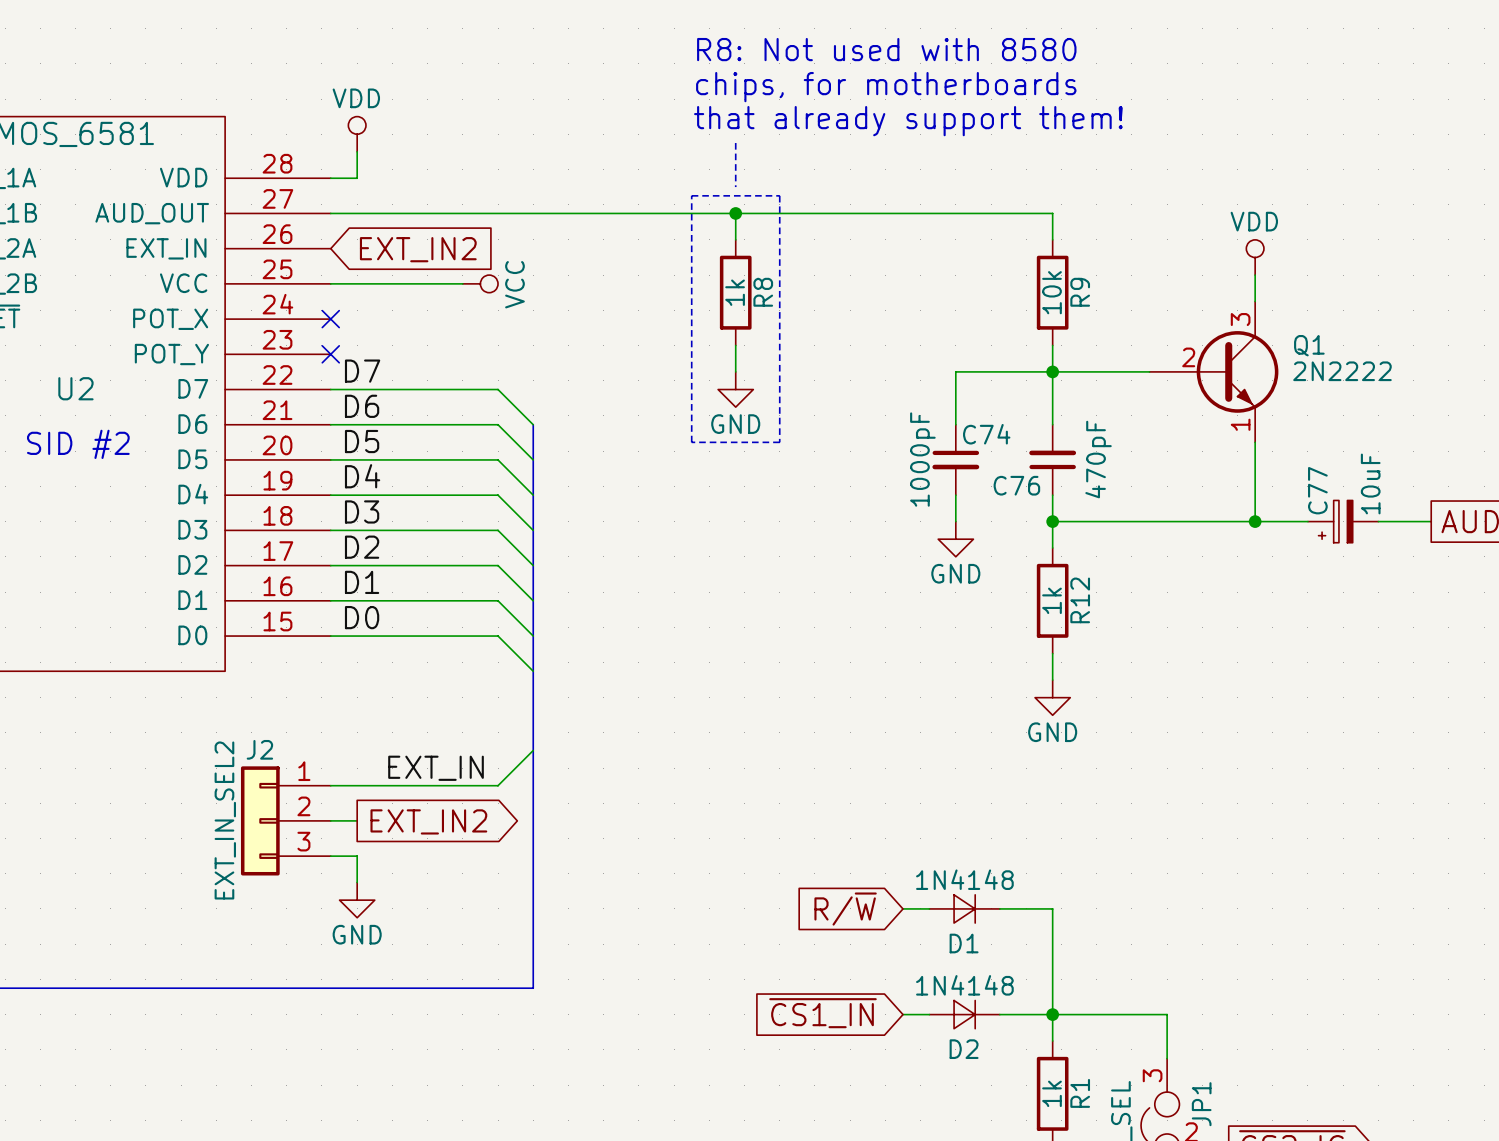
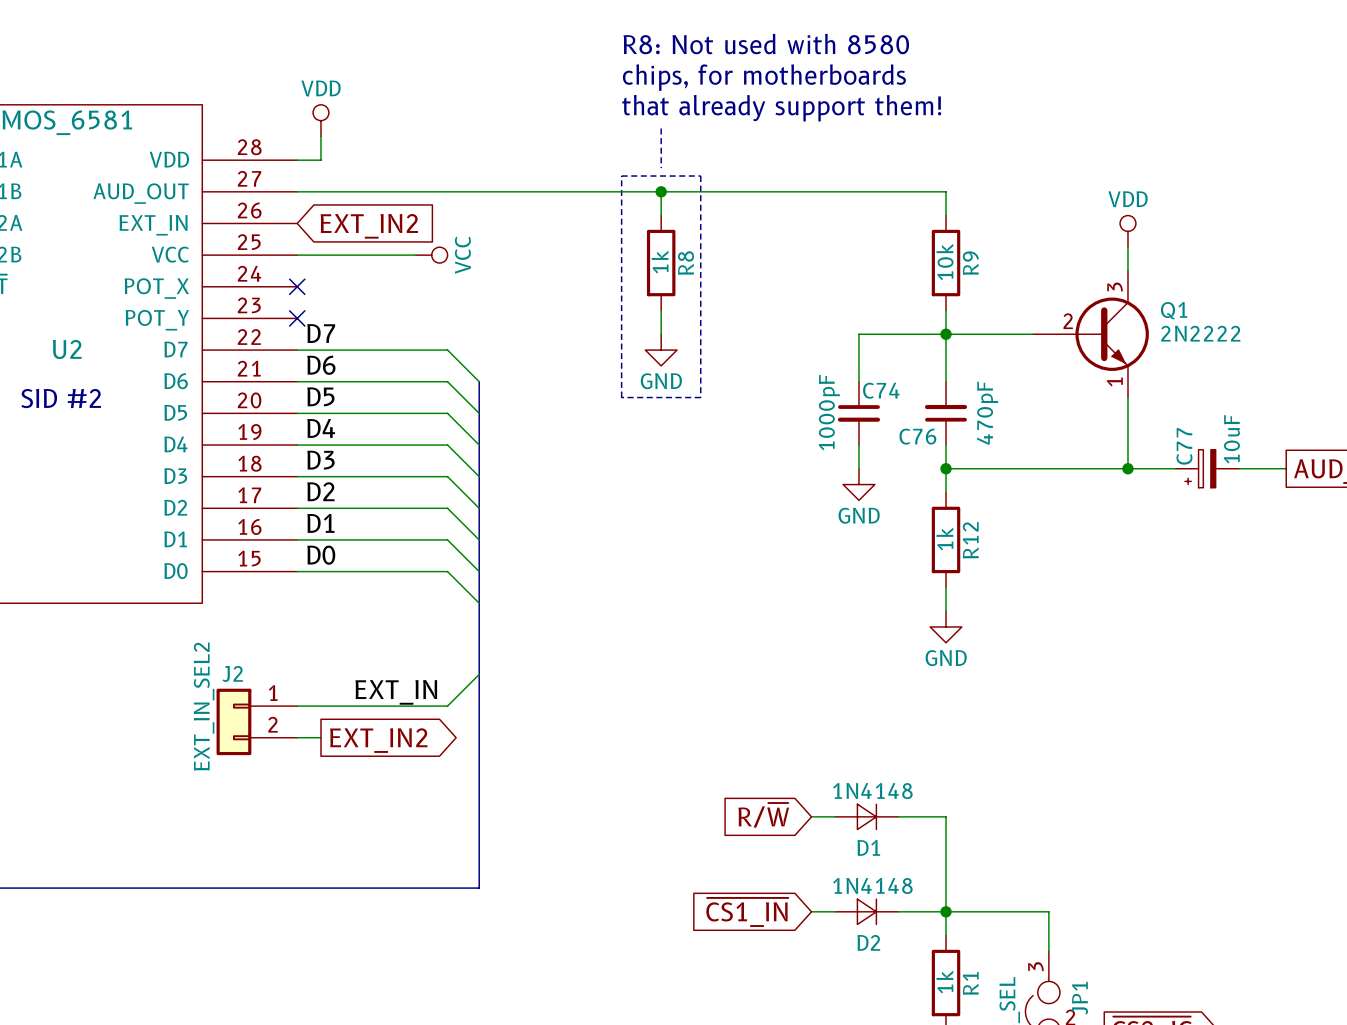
J2 symbol: [240, 766, 331, 876] -> [216, 688, 298, 756]
wire: (330, 856) (357, 856) (357, 882) -> none
power symbol: GND (357, 900) -> none

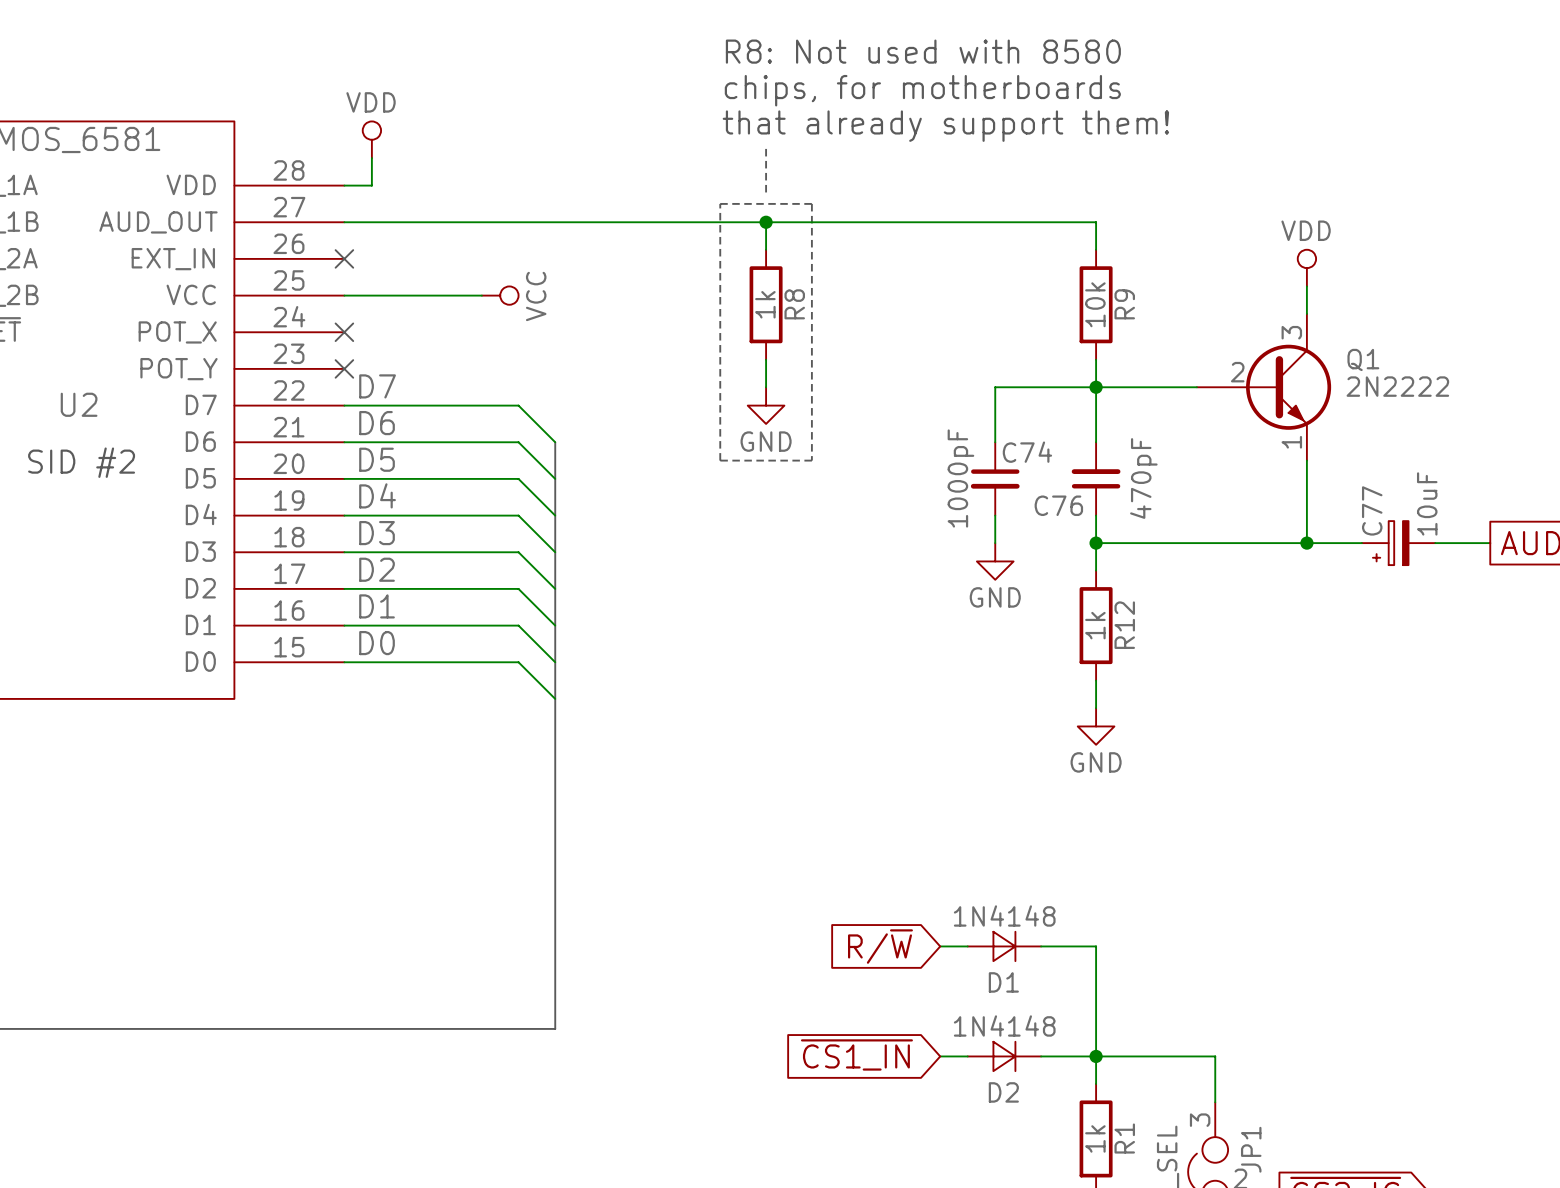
no-connect mark: none -> (344, 258)
global label: EXT_IN2 (369, 226) -> none
wire: (479, 674) (447, 706) (297, 706) -> none
label: EXT_IN (396, 692) -> none
J2: EXT_IN_SEL2 (256, 721) -> none
wire: (297, 737) (320, 737) -> none
global label: EXT_IN2 (378, 740) -> none

